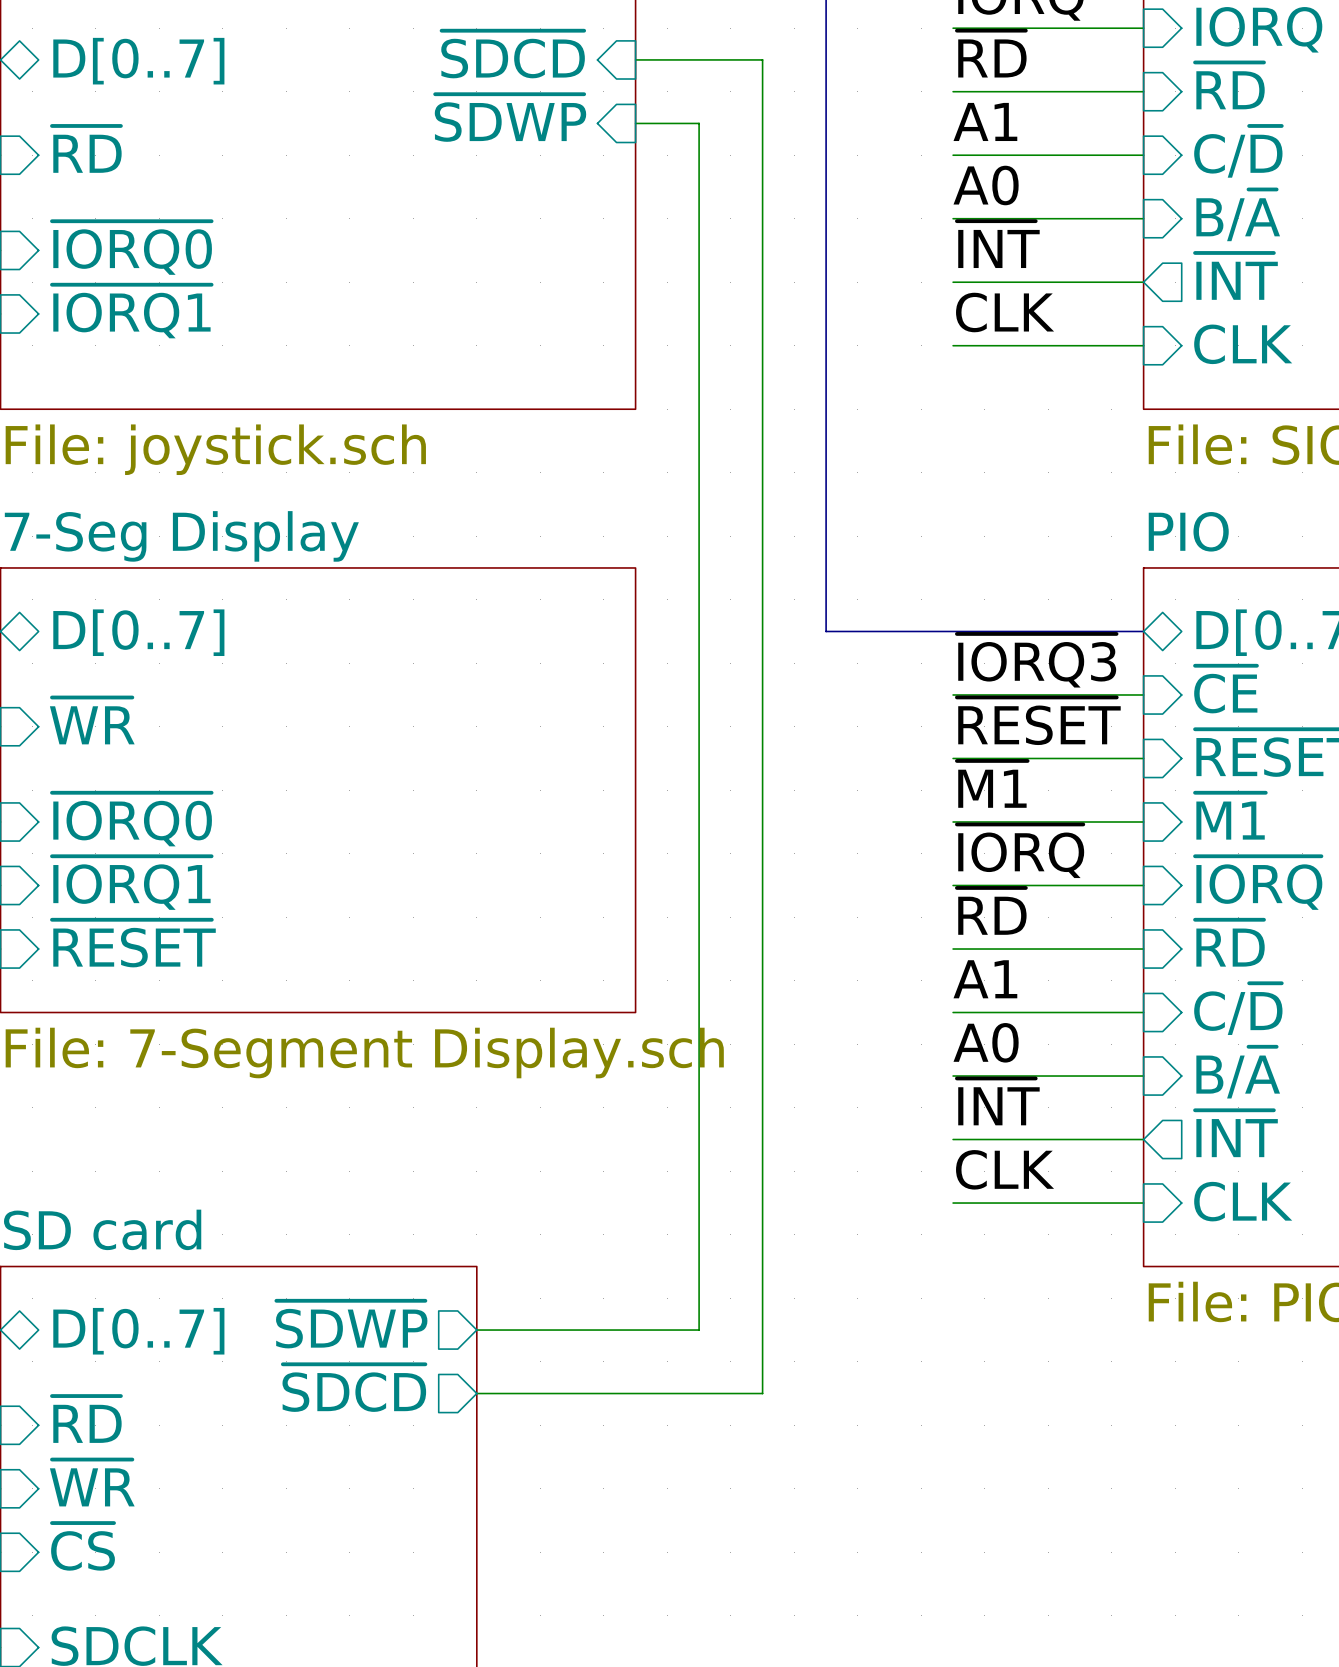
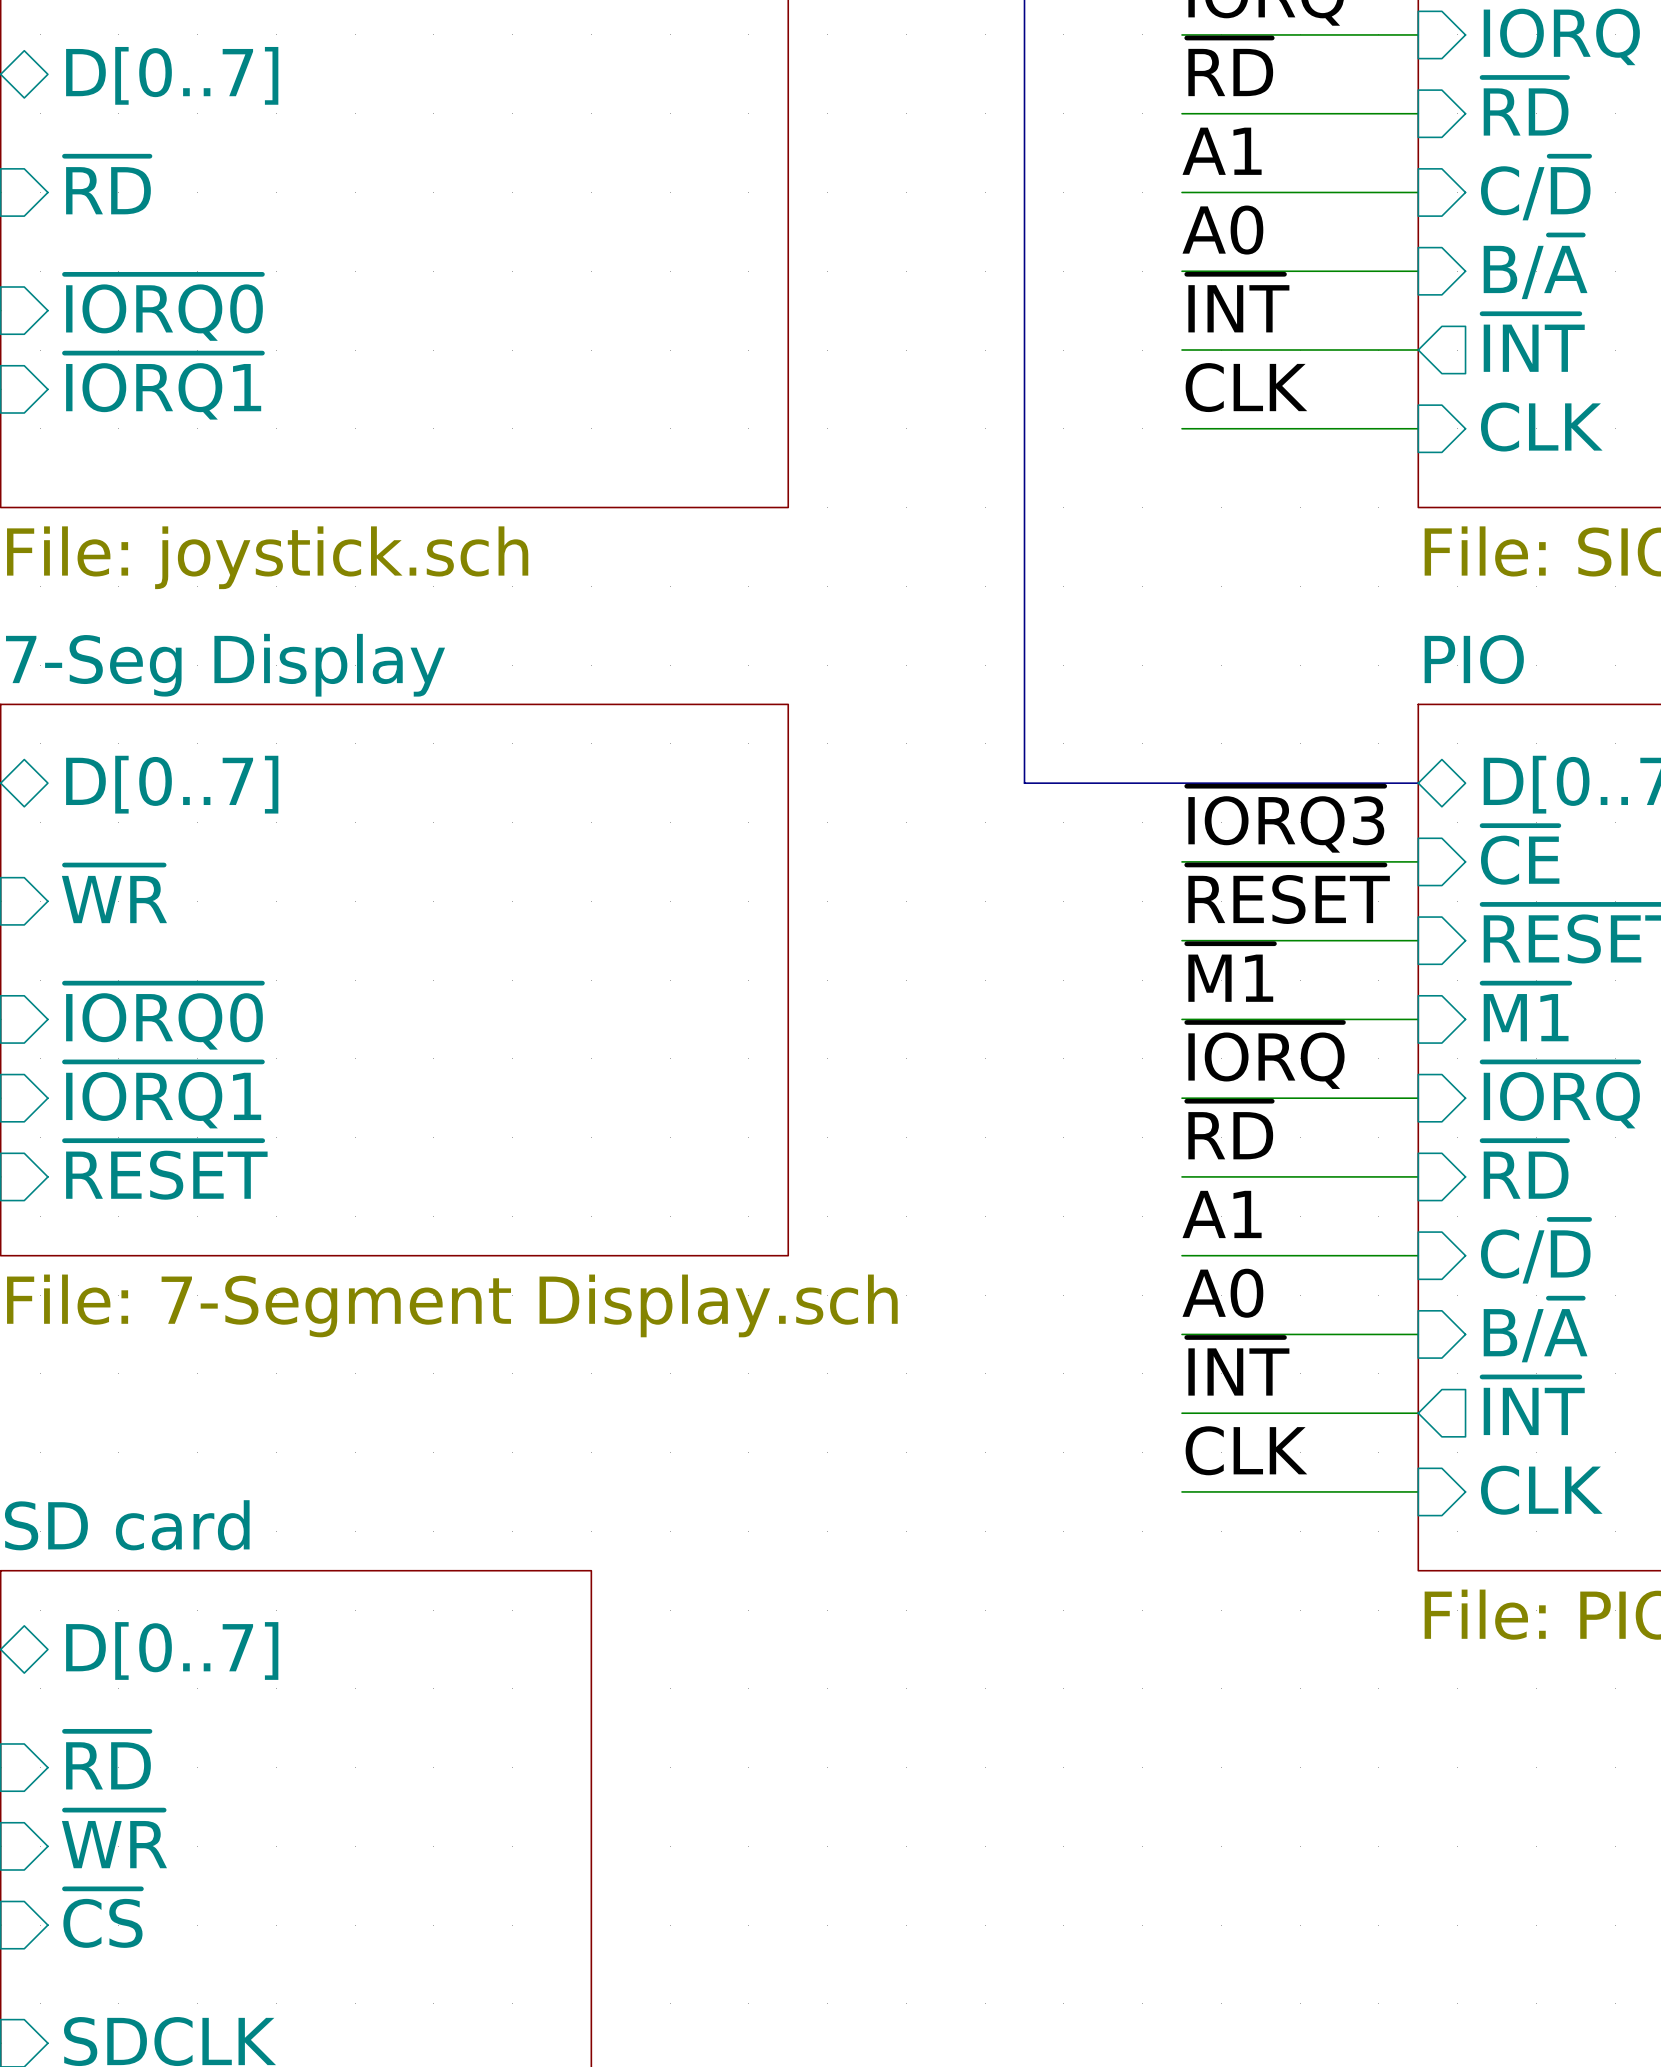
sheet pin: ~{SDCD} (513, 54) -> none
wire: (635, 59) (762, 59) (762, 1393) (476, 1393) -> none
sheet pin: ~{SDWP} (510, 118) -> none
wire: (635, 123) (699, 123) (699, 1330) (476, 1330) -> none
sheet pin: ~{SDWP} (351, 1324) -> none
sheet pin: ~{SDCD} (354, 1388) -> none

